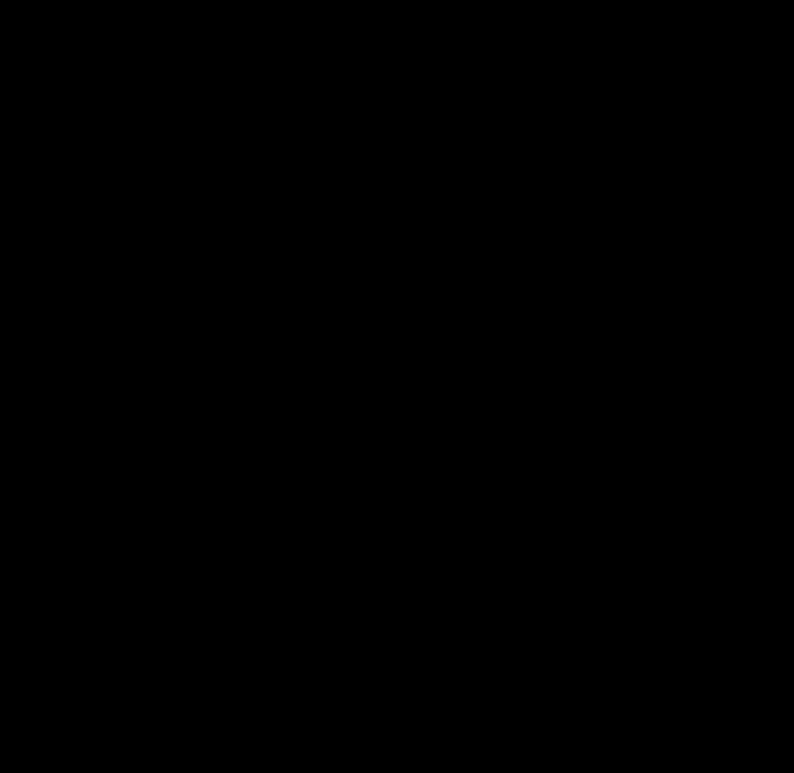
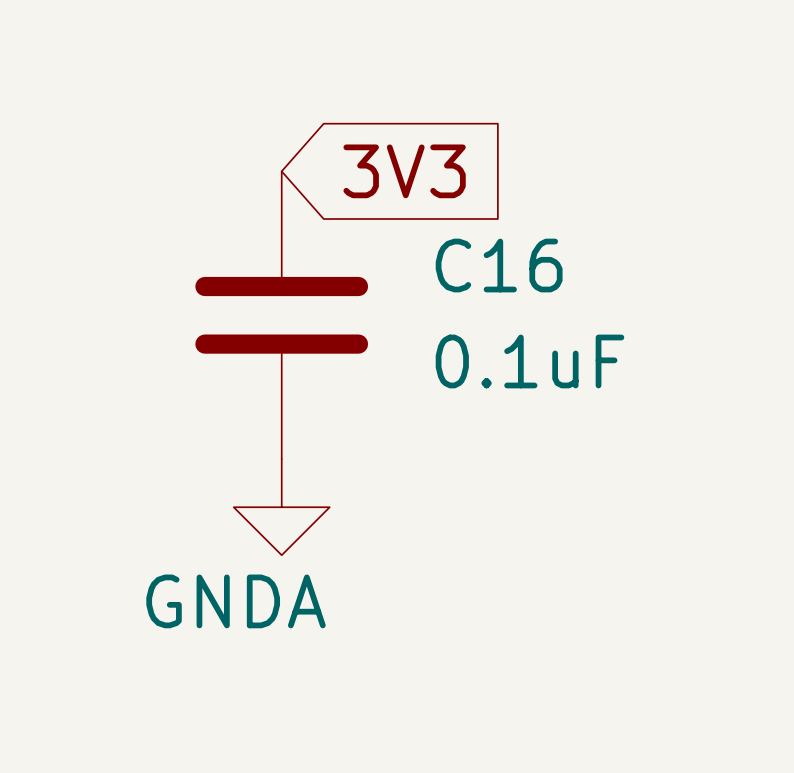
global label: none -> 3V3 (404, 171)
C16: none -> 0.1uF (281, 315)
power symbol: none -> GNDA (281, 507)

